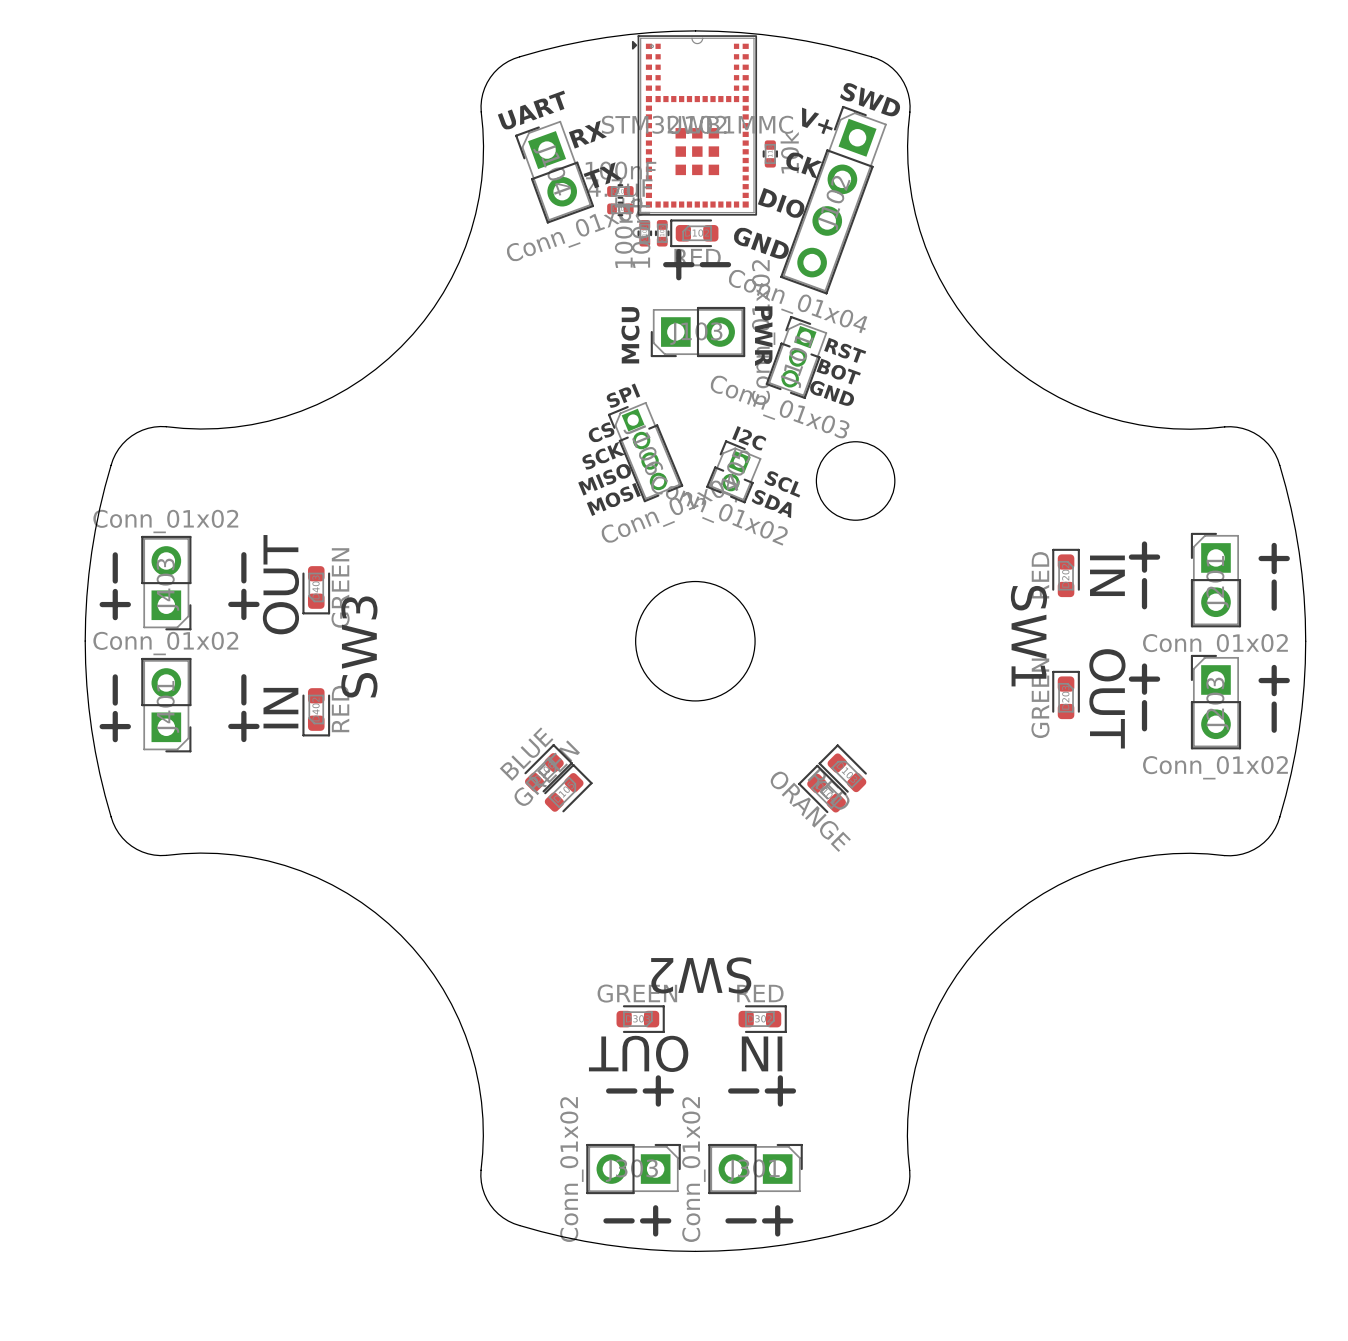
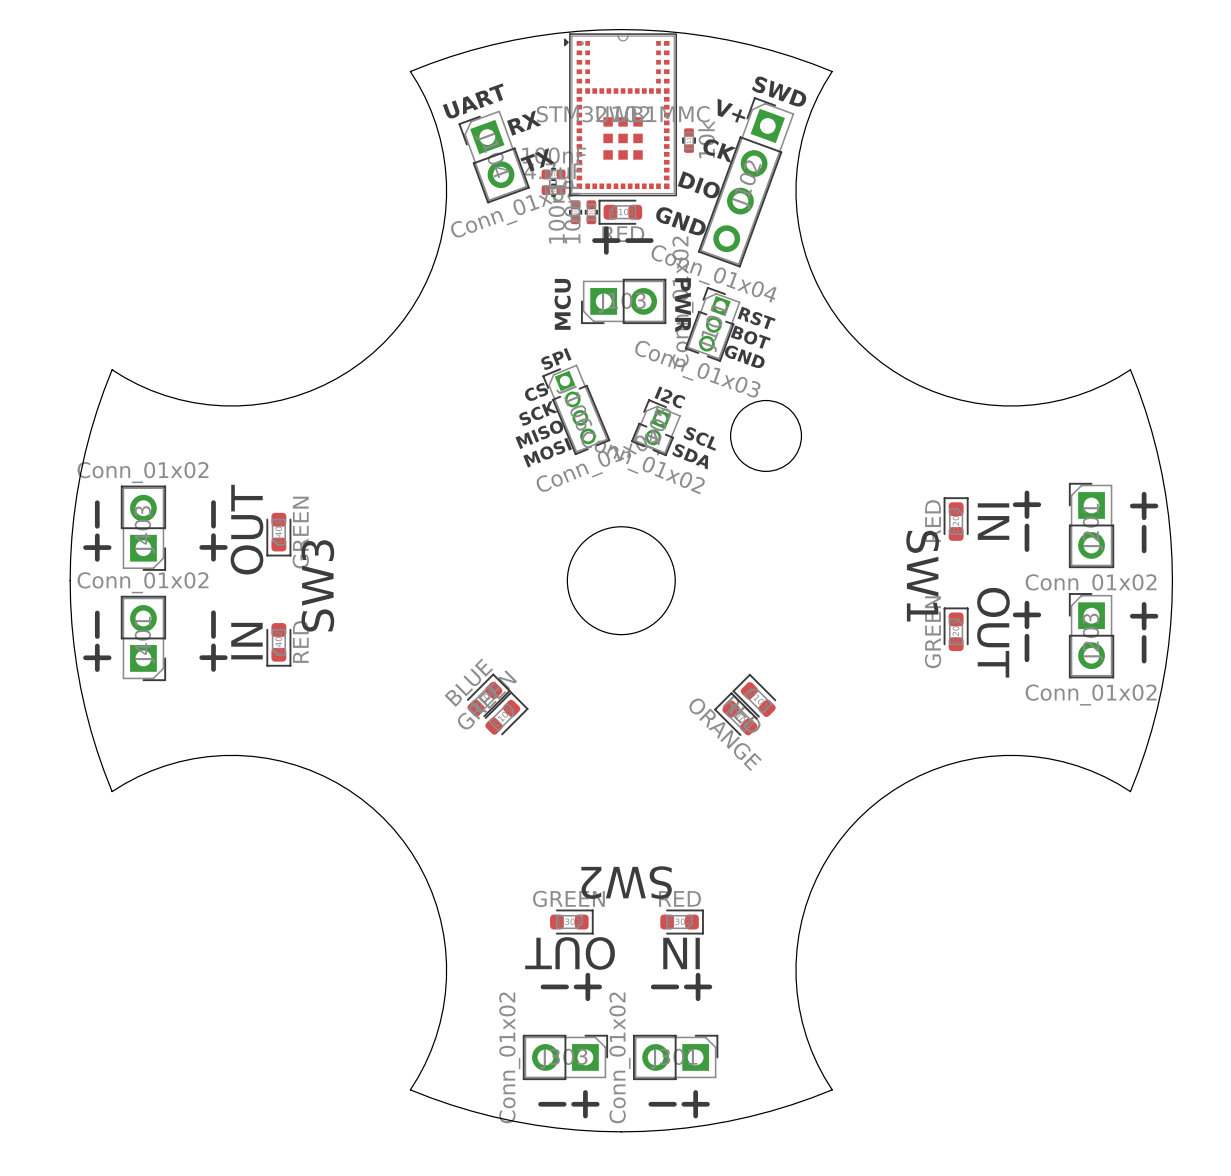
board edge: (1279, 465) (1272, 448) (1264, 439) (1242, 428) (1230, 426) (1190, 429) (1156, 427) (1122, 421) (1089, 411) (1043, 389) (1015, 369) (989, 346) (957, 307) (939, 278) (925, 246) (915, 214) (909, 180) (907, 146) (910, 105) (908, 93) (900, 77) (882, 61) (849, 50) (784, 37) (740, 32) (695, 30) (651, 32) (606, 37) (562, 45) (519, 56) (503, 64) (494, 72) (482, 93) (481, 105) (483, 146) (481, 180) (475, 213) (465, 246) (451, 277) (434, 307) (401, 346) (361, 379) (332, 397) (301, 411) (268, 421) (234, 427) (200, 429) (160, 426) (148, 428) (126, 439) (115, 454) (105, 486) (91, 552) (86, 596) (85, 641) (86, 685) (91, 729) (99, 773) (111, 816) (118, 833) (126, 842) (148, 853) (160, 855) (200, 853) (234, 854) (268, 860) (300, 870) (347, 893) (375, 912) (401, 935) (423, 961) (443, 989) (465, 1035) (475, 1068) (481, 1101) (483, 1136) (480, 1176) (482, 1188) (494, 1209) (508, 1221) (541, 1231) (606, 1244) (650, 1249) (695, 1251) (739, 1249) (784, 1244) (828, 1236) (871, 1225) (887, 1217) (896, 1209) (908, 1188) (909, 1176) (907, 1136) (909, 1102) (915, 1068) (925, 1035) (939, 1004) (956, 975) (989, 935) (1029, 902) (1058, 885) (1089, 871) (1122, 861) (1156, 855) (1190, 853) (1230, 855) (1242, 854) (1264, 842) (1275, 828) (1285, 795) (1299, 730) (1304, 685) (1305, 641) (1304, 596) (1299, 552) (1291, 508) (1279, 465) -> (70, 580) (70, 602) (71, 623) (73, 645) (80, 688) (90, 730) (112, 791) (151, 770) (179, 761) (208, 756) (237, 755) (267, 758) (296, 765) (323, 776) (349, 790) (383, 818) (411, 852) (431, 892) (443, 934) (446, 978) (443, 1008) (431, 1050) (410, 1089) (450, 1104) (513, 1121) (578, 1130) (621, 1131) (686, 1128) (728, 1121) (791, 1104) (832, 1089) (811, 1050) (799, 1008) (796, 964) (801, 920) (816, 878) (839, 840) (869, 808) (893, 790) (919, 776) (946, 765) (975, 758) (1004, 755) (1034, 756) (1063, 761) (1091, 770) (1130, 791) (1145, 751) (1161, 688) (1170, 623) (1172, 580) (1168, 515) (1161, 473) (1151, 431) (1130, 369) (1091, 390) (1048, 402) (1004, 405) (960, 400) (919, 385) (893, 370) (858, 343) (831, 308) (816, 282) (805, 255) (798, 226) (796, 197) (799, 153) (806, 124) (817, 97) (832, 71) (791, 56) (728, 40) (686, 33) (621, 29) (556, 33) (513, 40) (471, 50) (410, 71) (431, 110) (443, 153) (446, 197) (440, 241) (425, 282) (411, 308) (383, 343) (349, 370) (323, 385) (296, 396) (267, 403) (237, 405) (208, 404) (179, 399) (151, 390) (112, 369) (97, 410) (80, 473) (71, 537) (70, 559) (70, 580)

